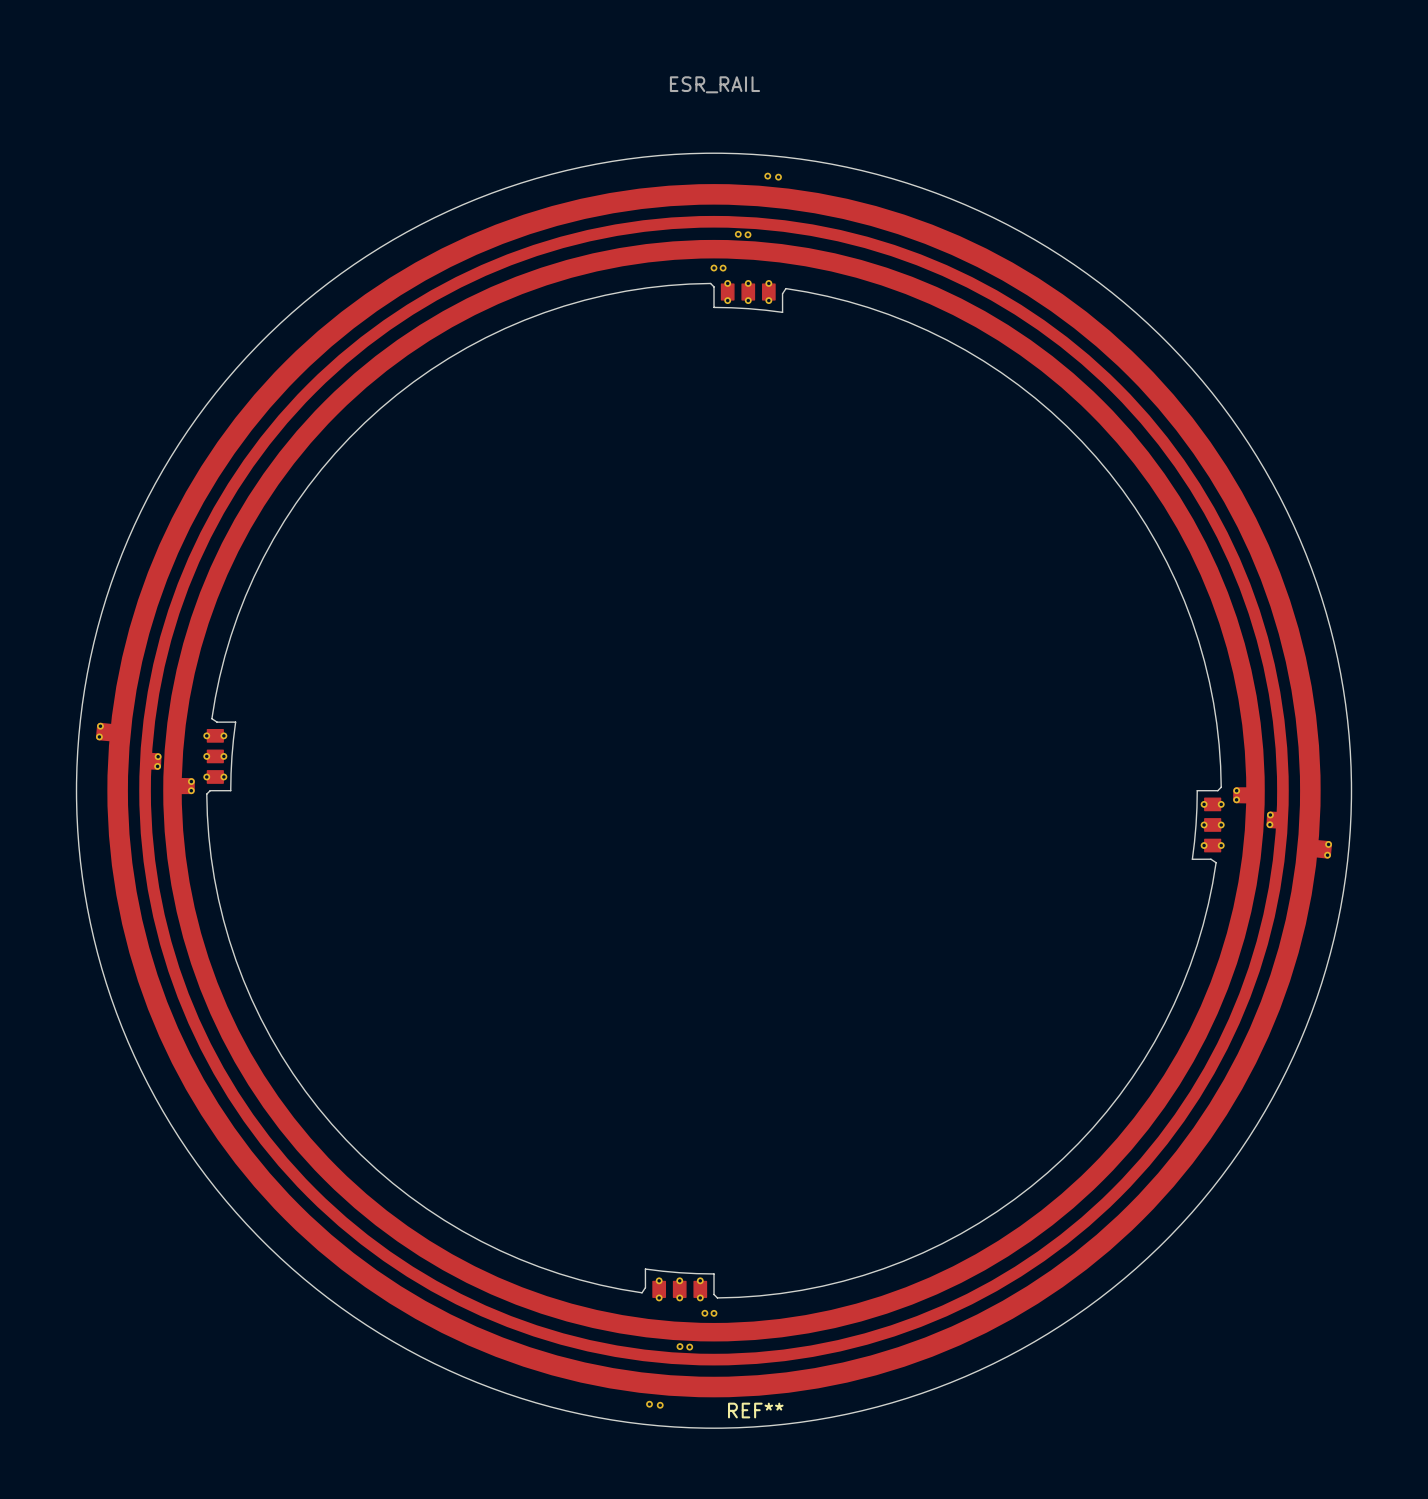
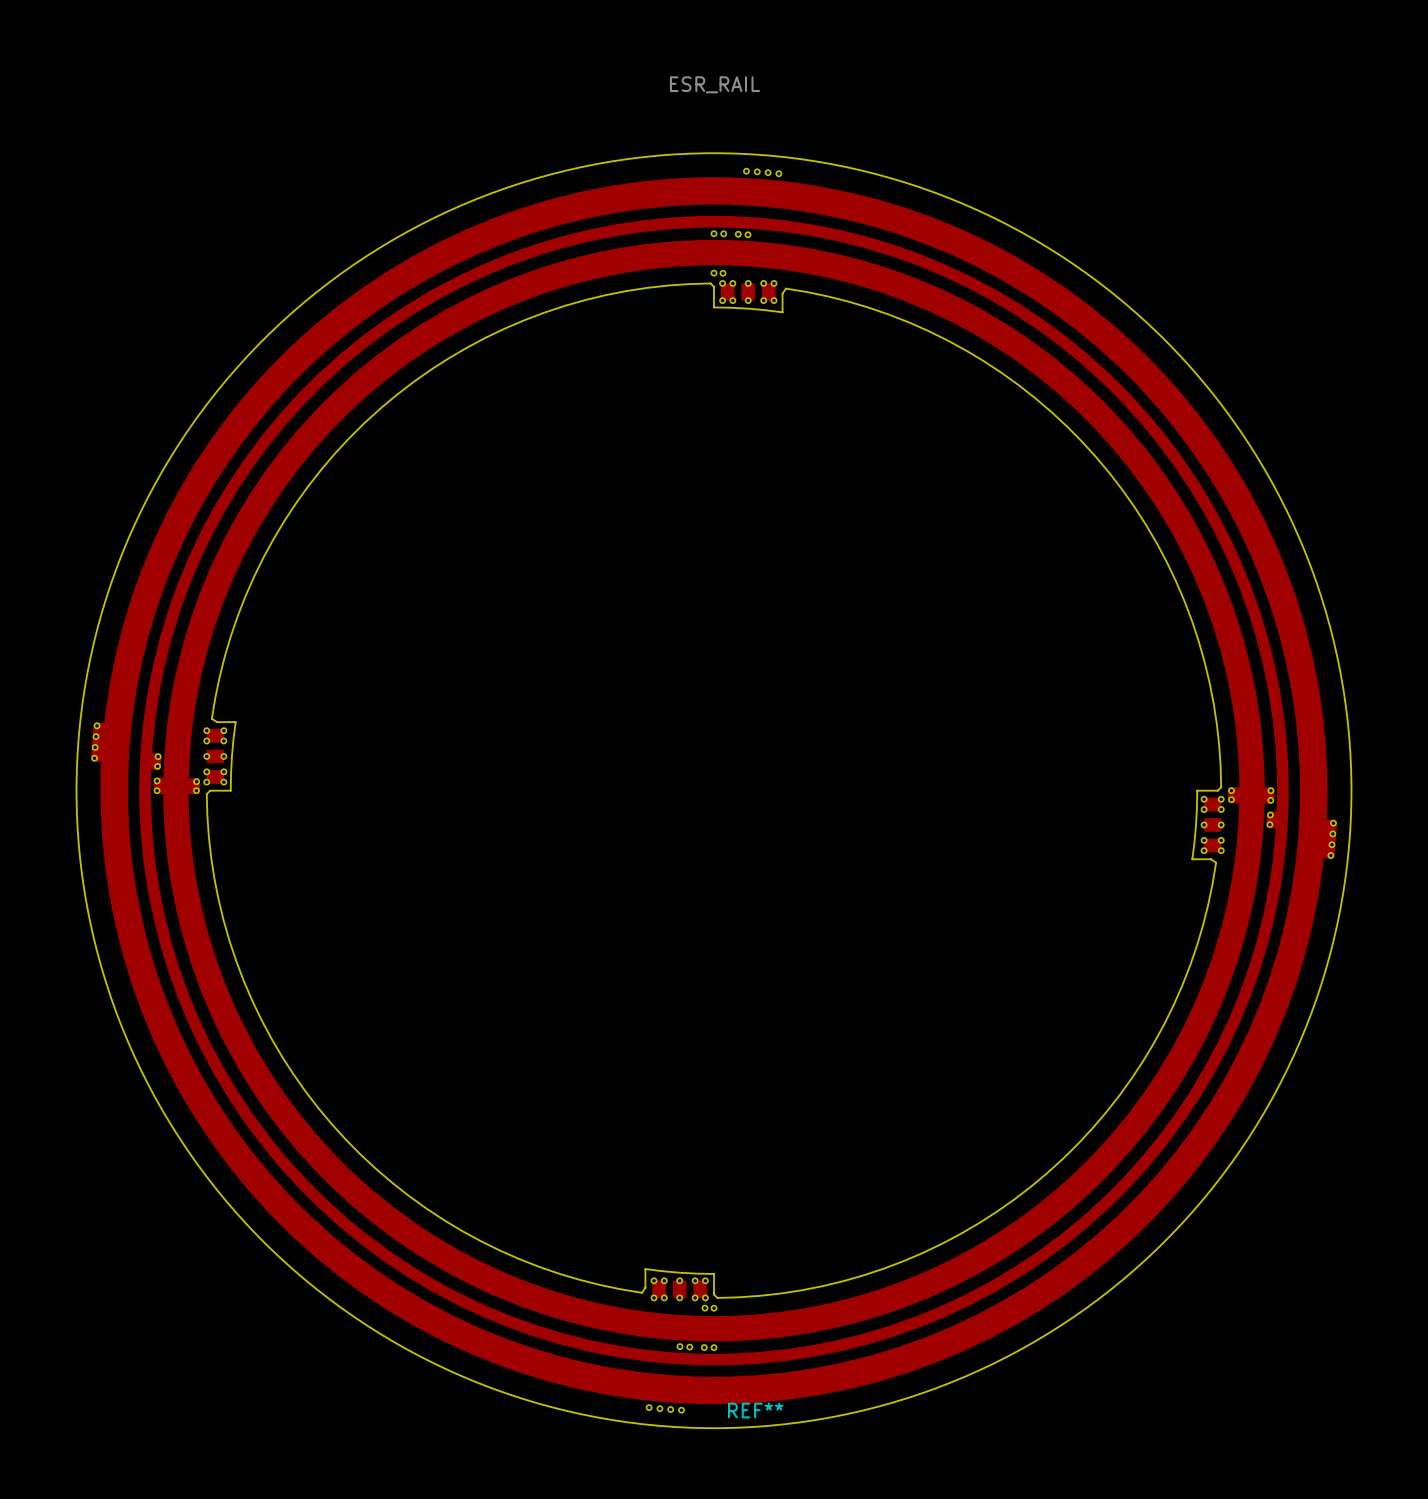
REF** footprint: [75, 152, 1353, 1429] -> [75, 152, 1353, 1429]

